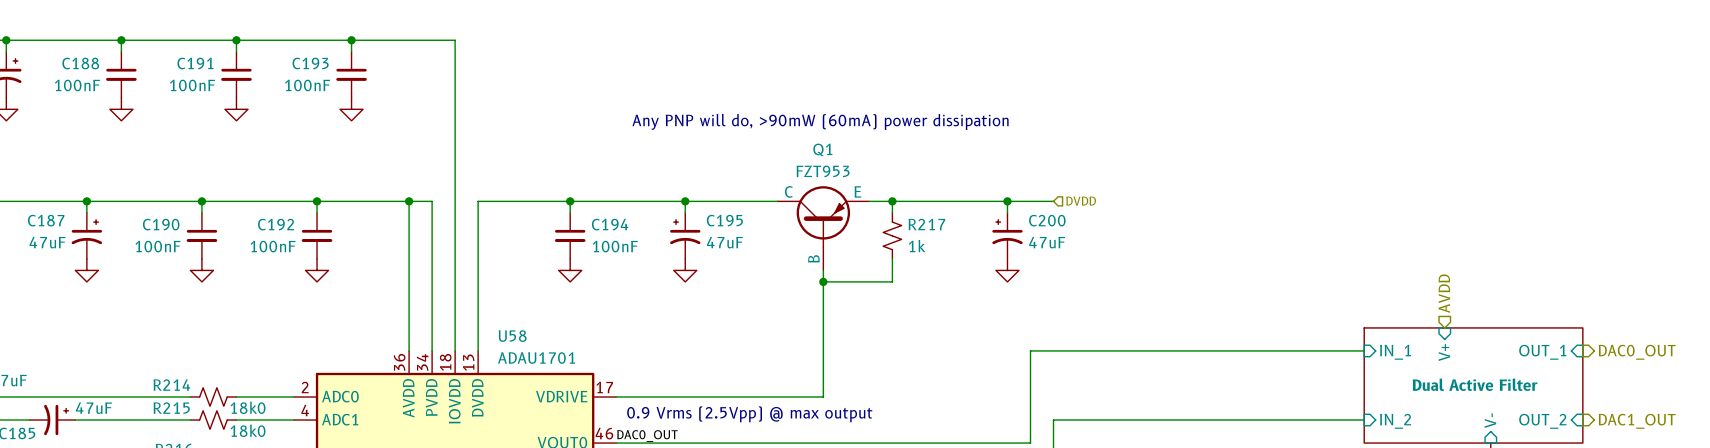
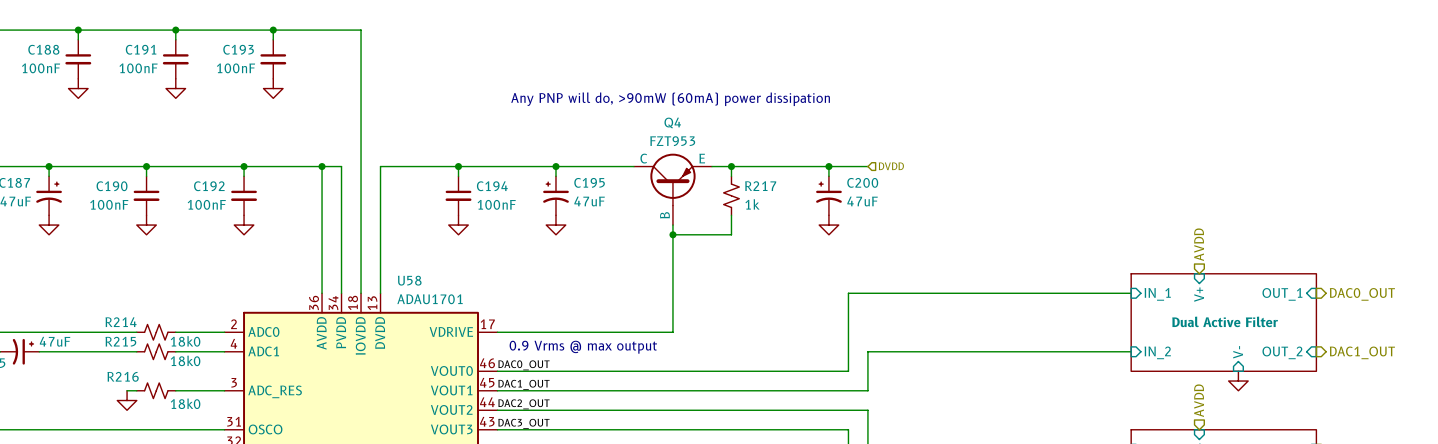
Q1 name: Q1 (822, 149) -> Q4 (672, 122)
text: 0.9 Vrms (2.5Vpp) @ max output (749, 414) -> 0.9 Vrms @ max output (583, 347)

